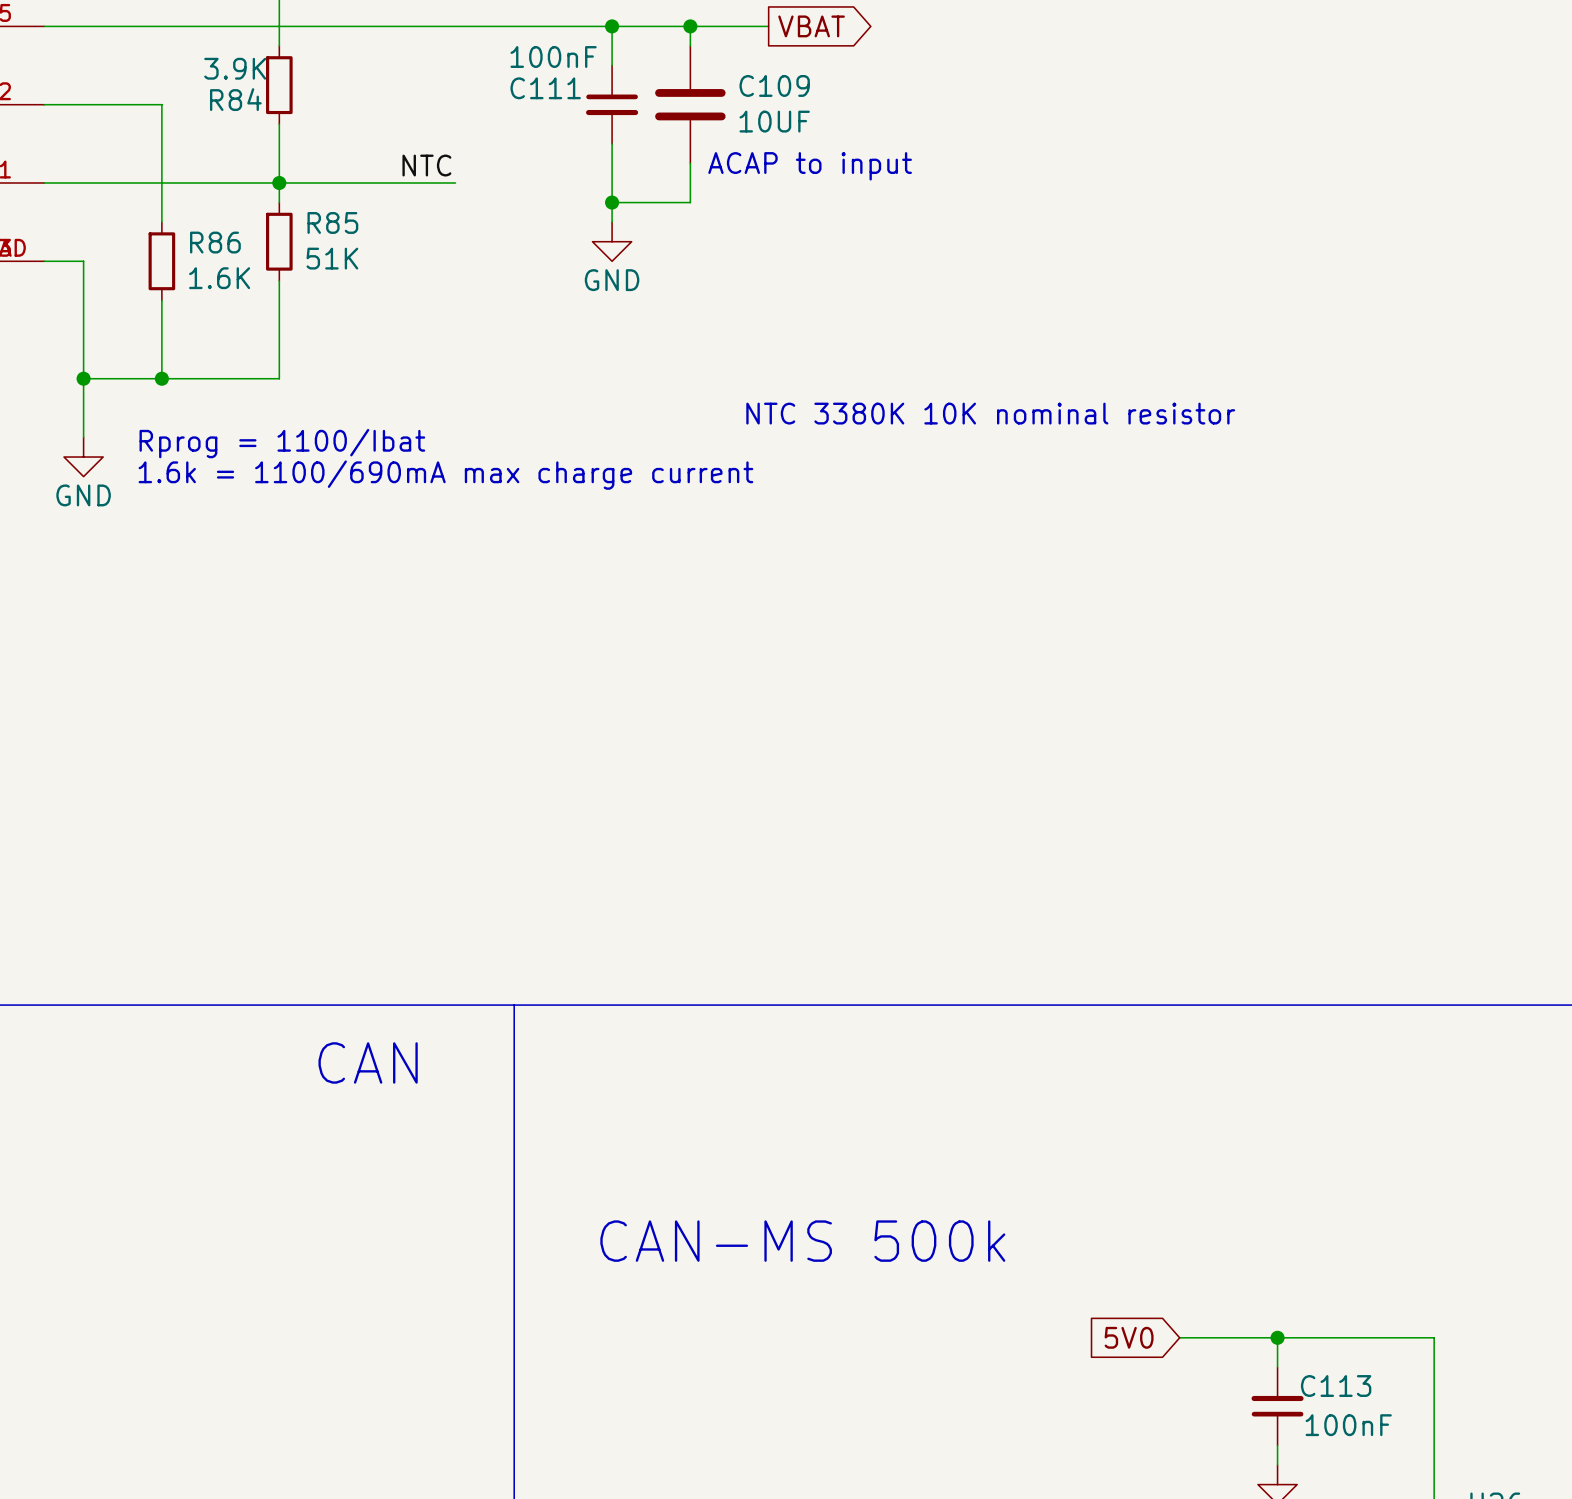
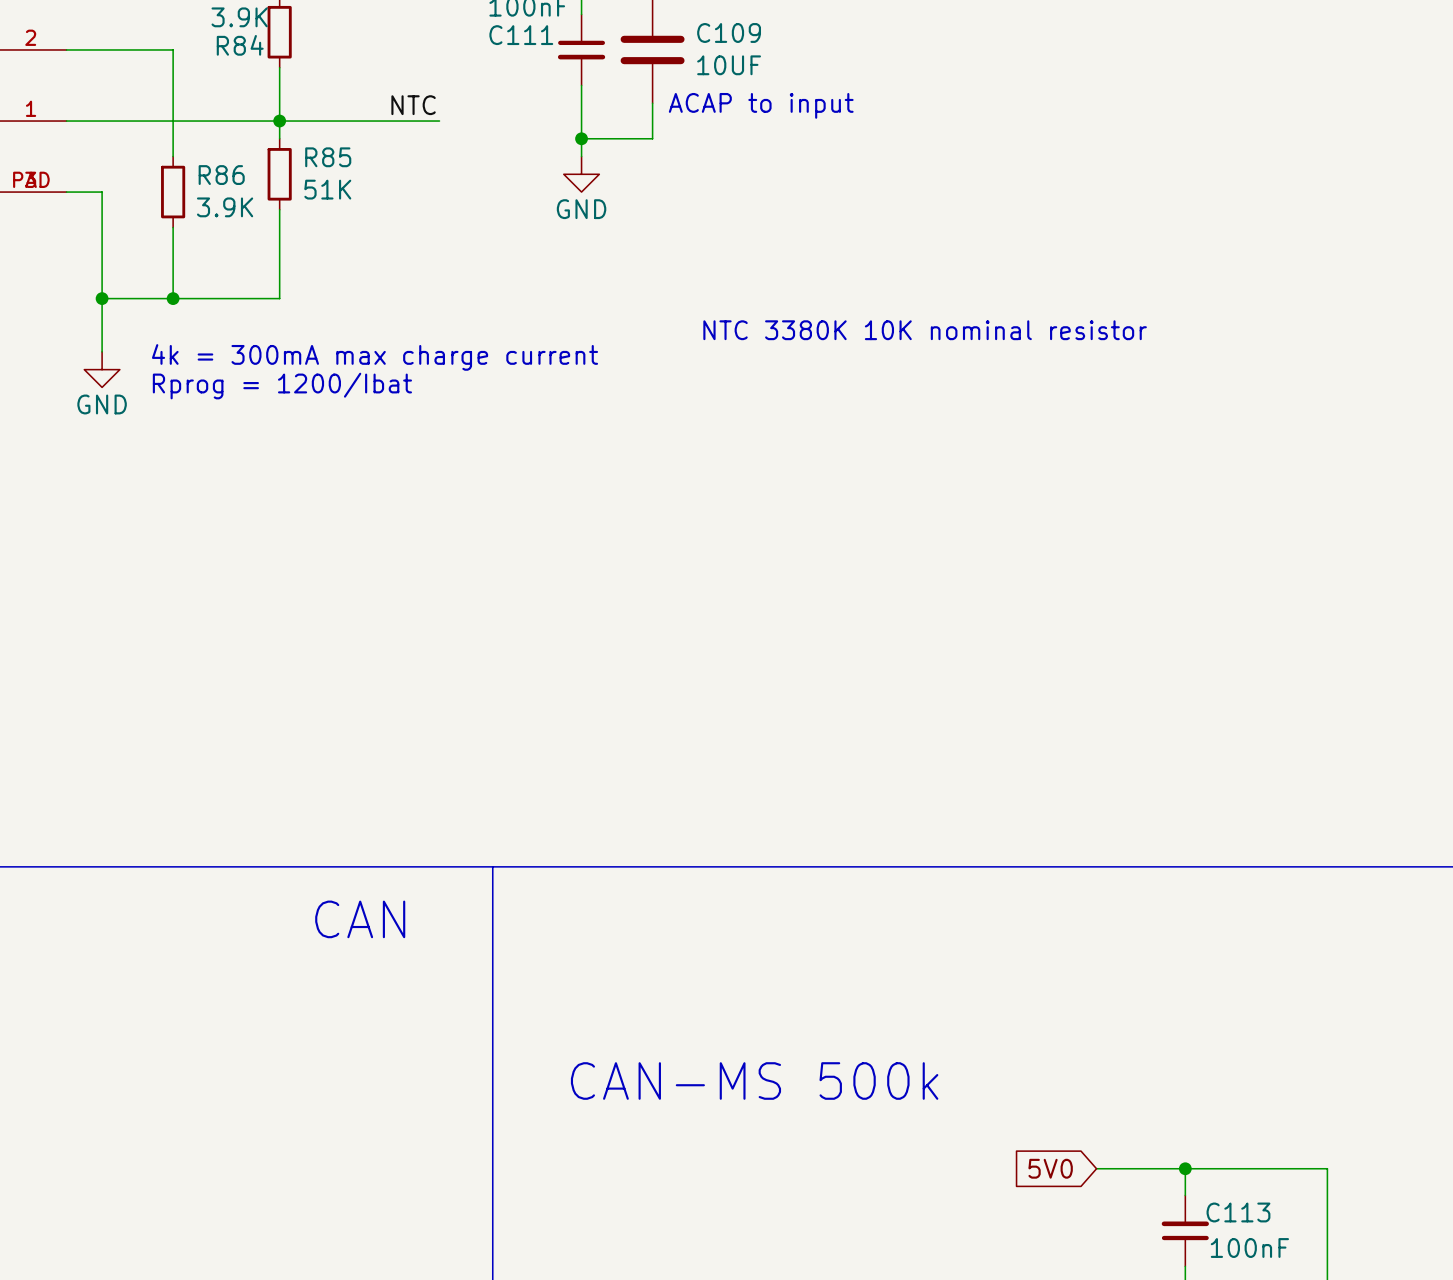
R86 value: 1.6K (219, 278) -> 3.9K (225, 207)
text: Rprog = 1100/Ibat (282, 443) -> 4k = 300mA max charge current (375, 357)
text: 1.6k = 1100/690mA max charge current (445, 475) -> Rprog = 1200/Ibat (282, 386)

